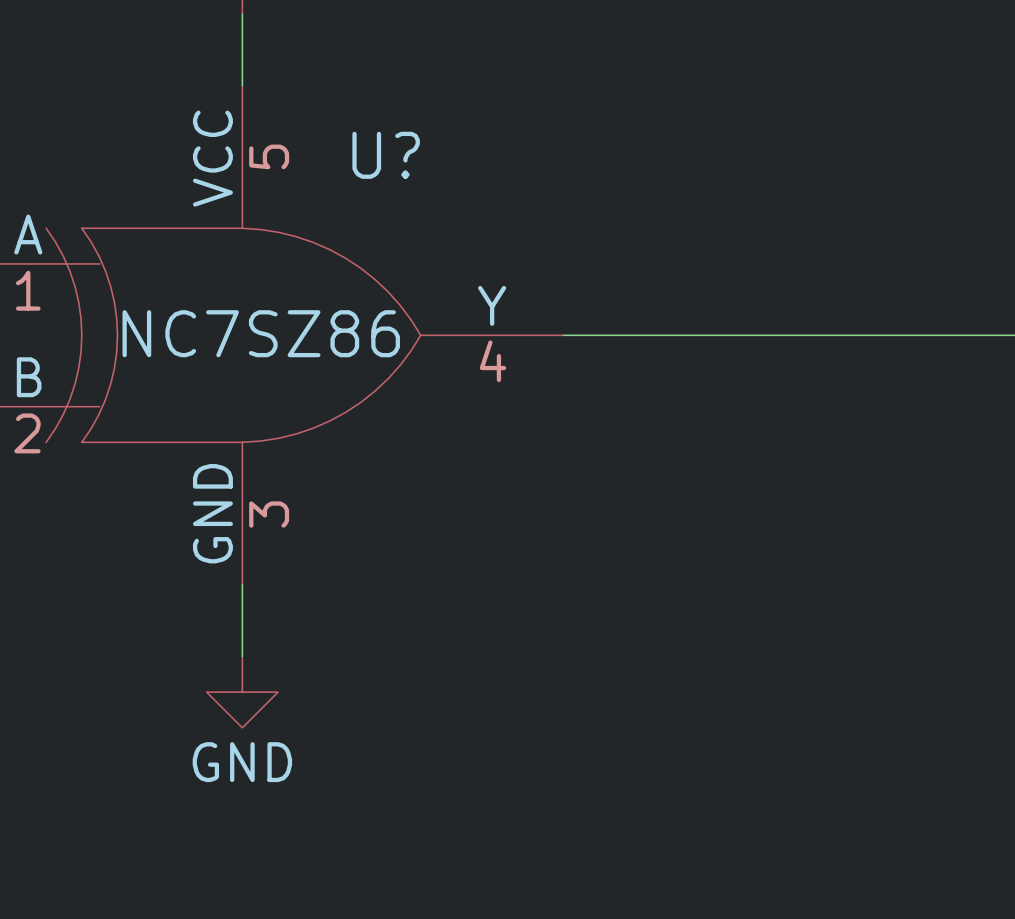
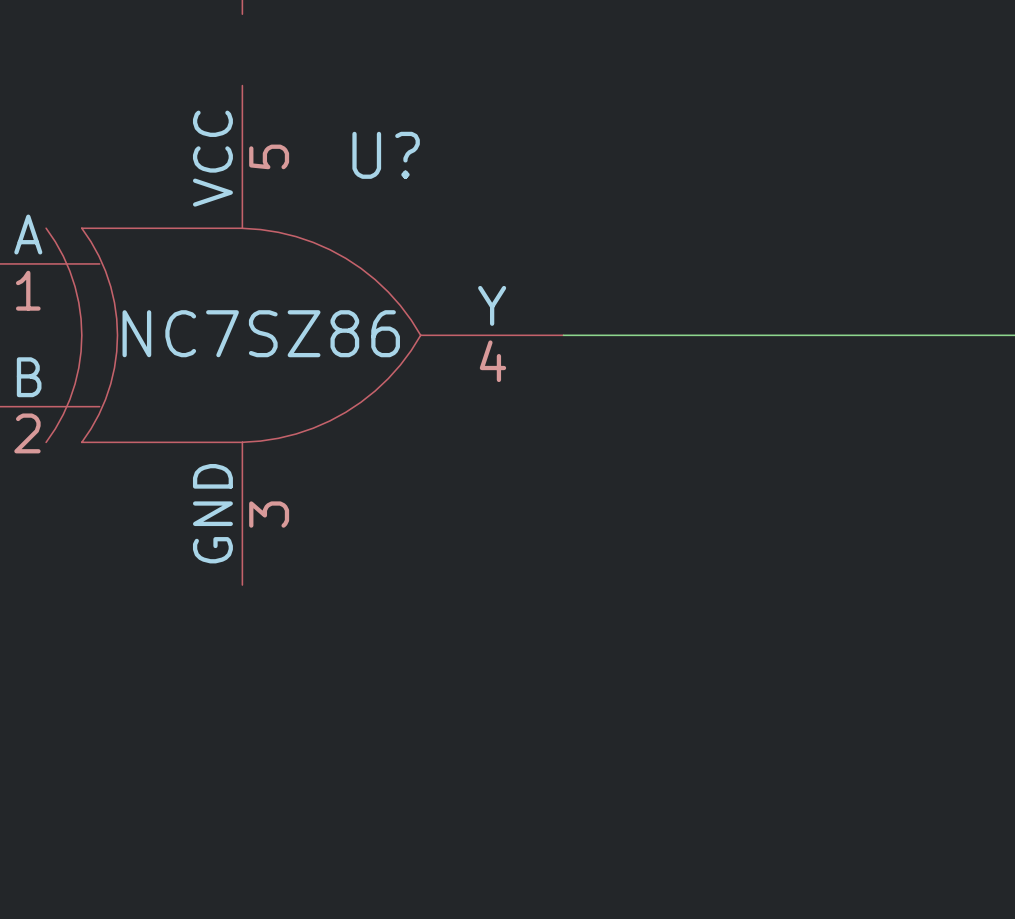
wire: (242, 14) (242, 85) -> none
wire: (242, 585) (242, 656) -> none
power symbol: GND (242, 692) -> none

